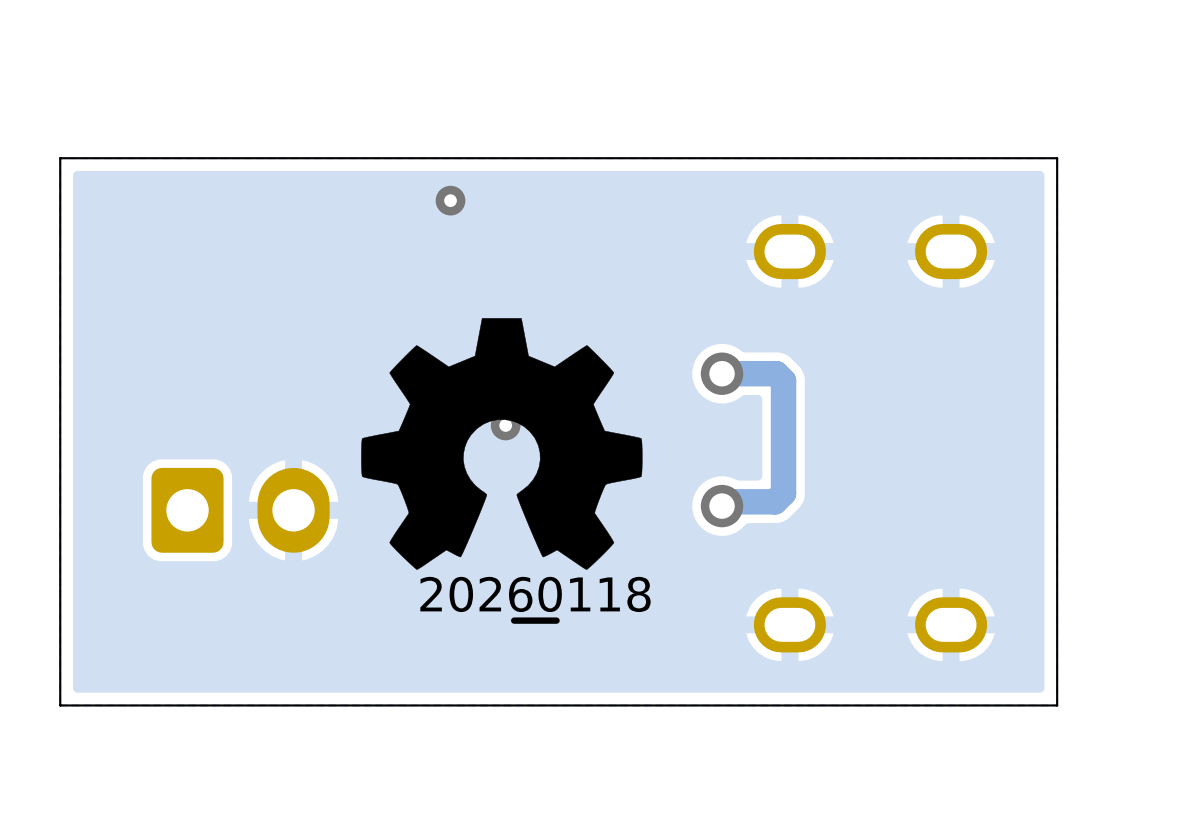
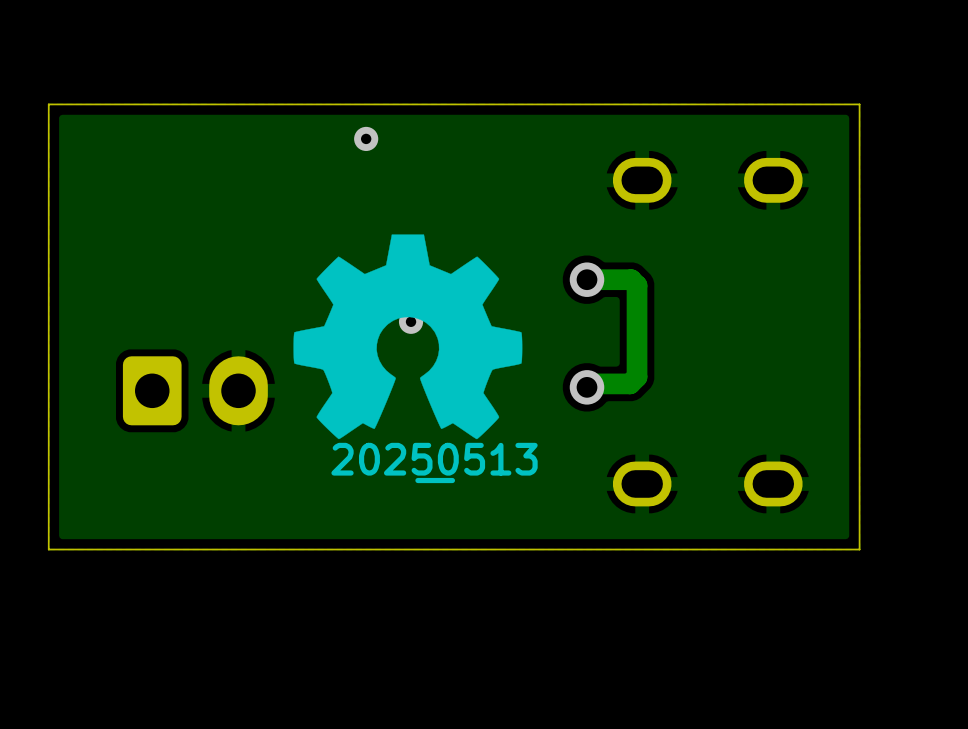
drawing shape: [420, 576, 651, 624] -> [331, 442, 538, 484]

